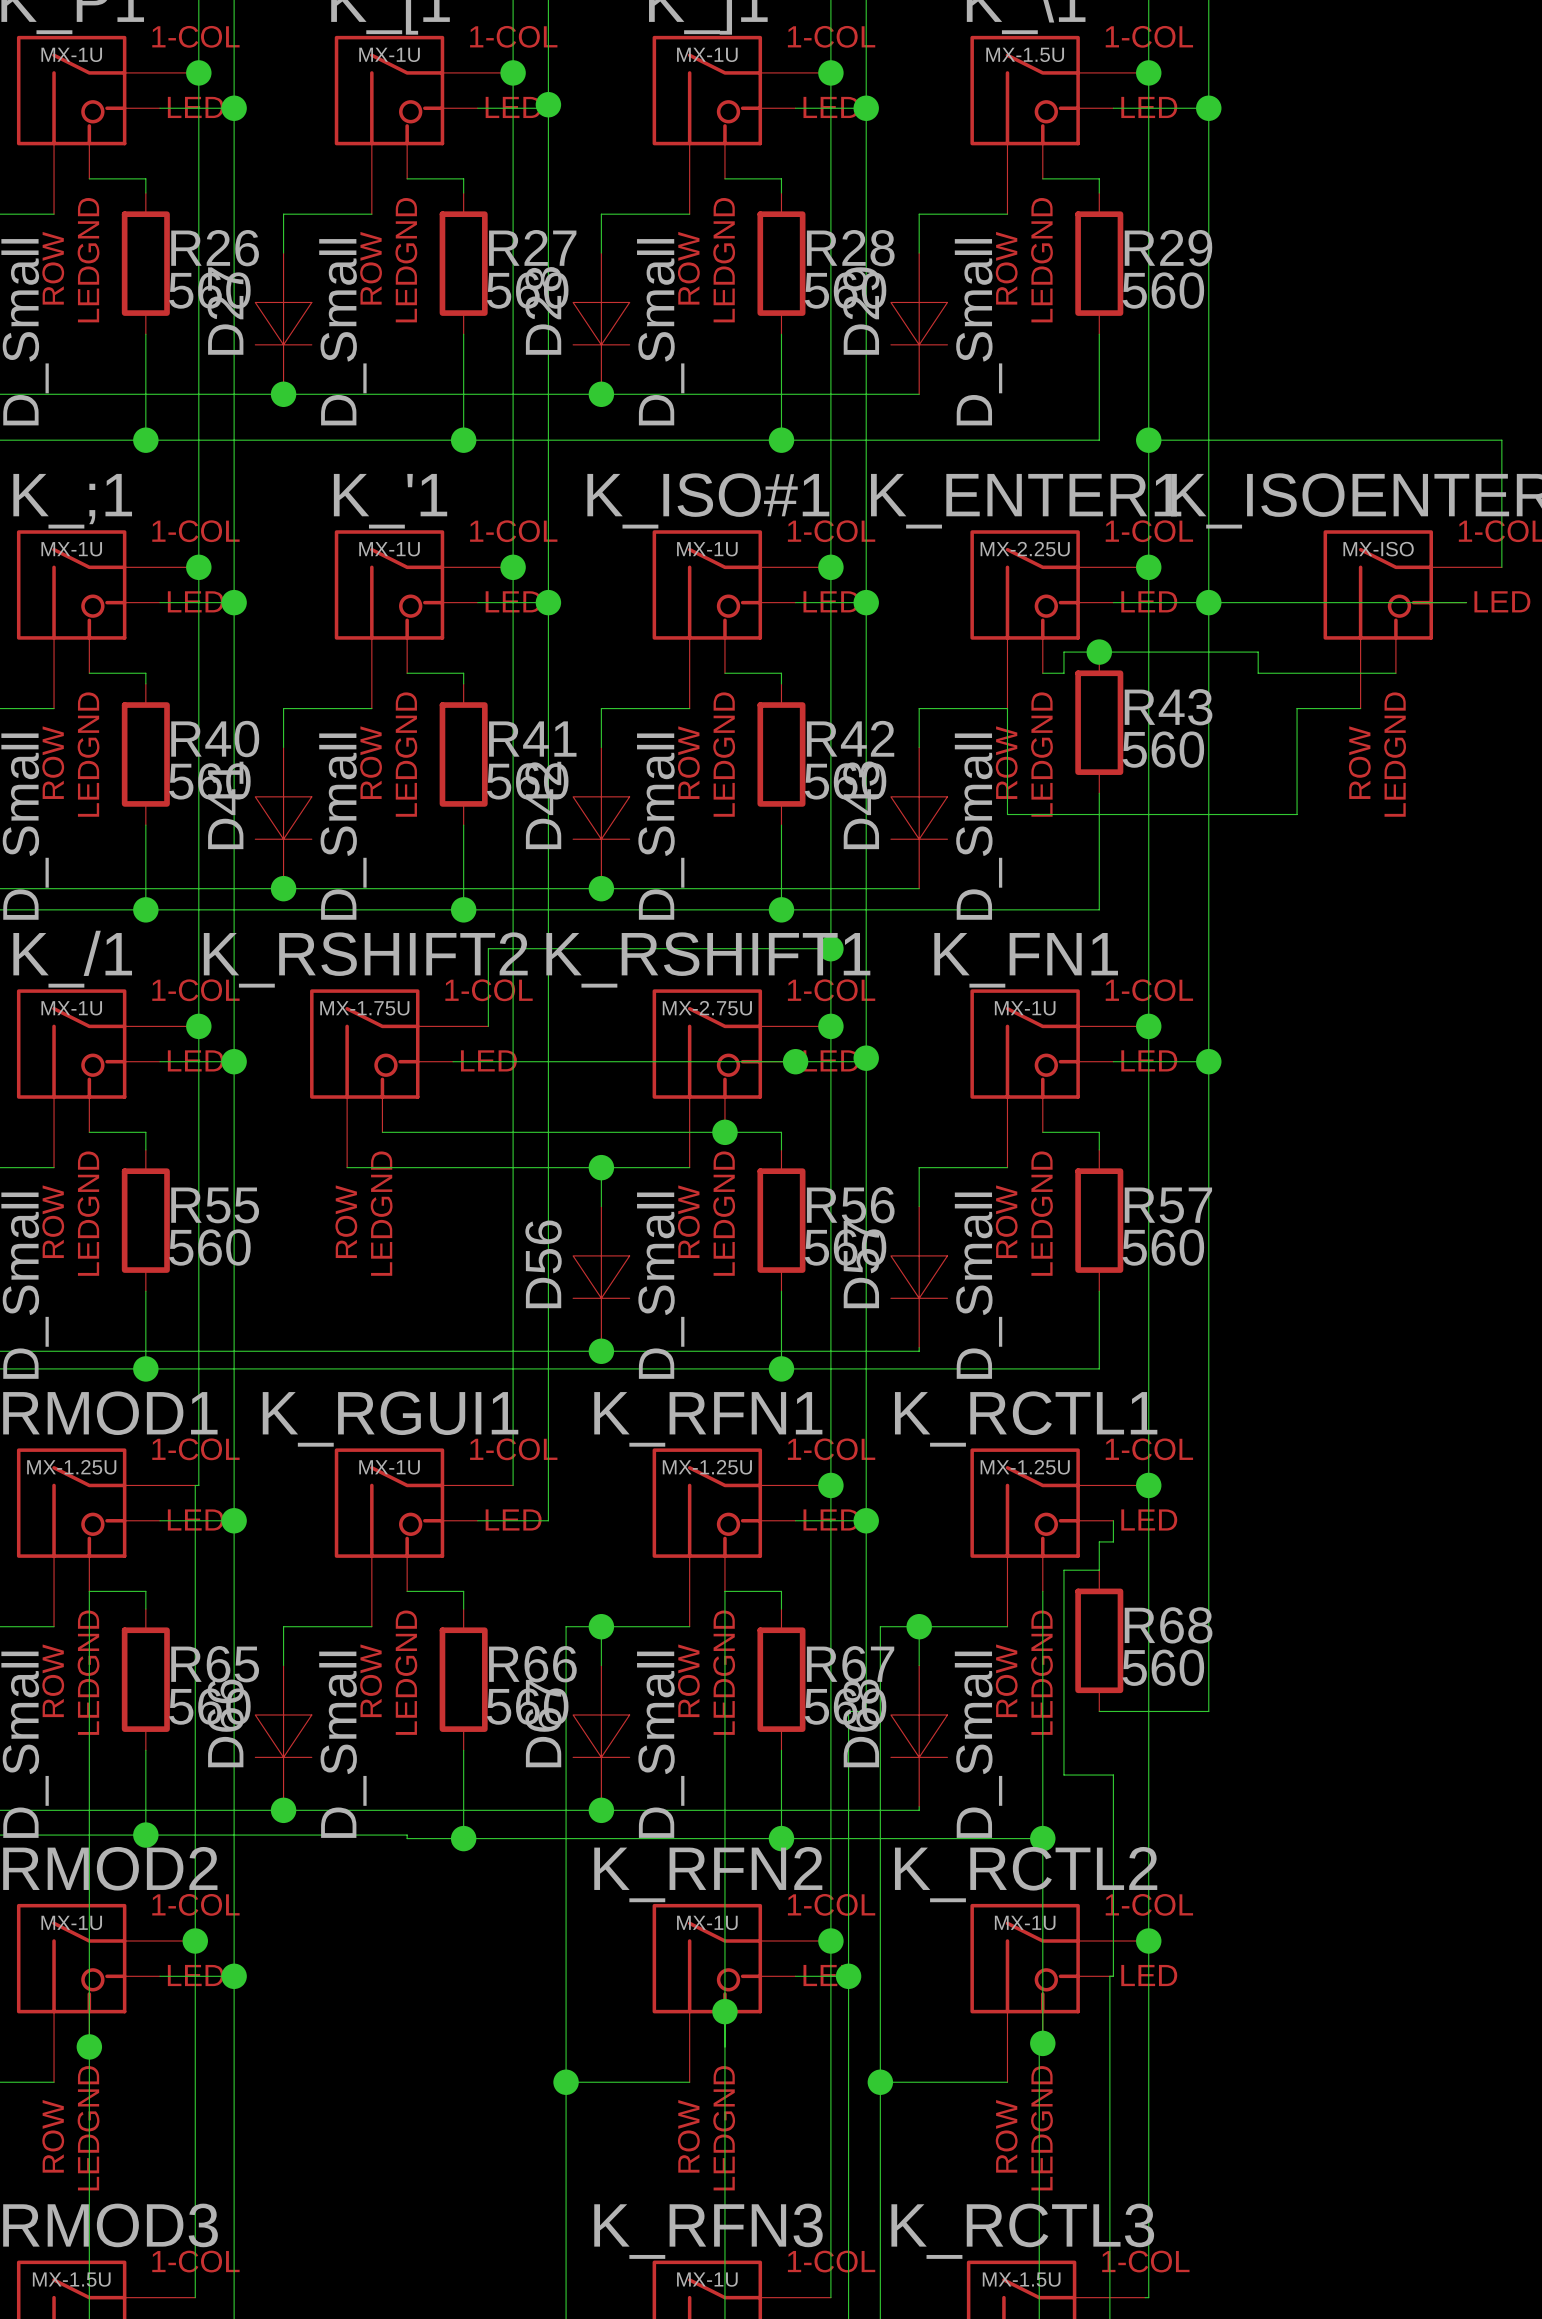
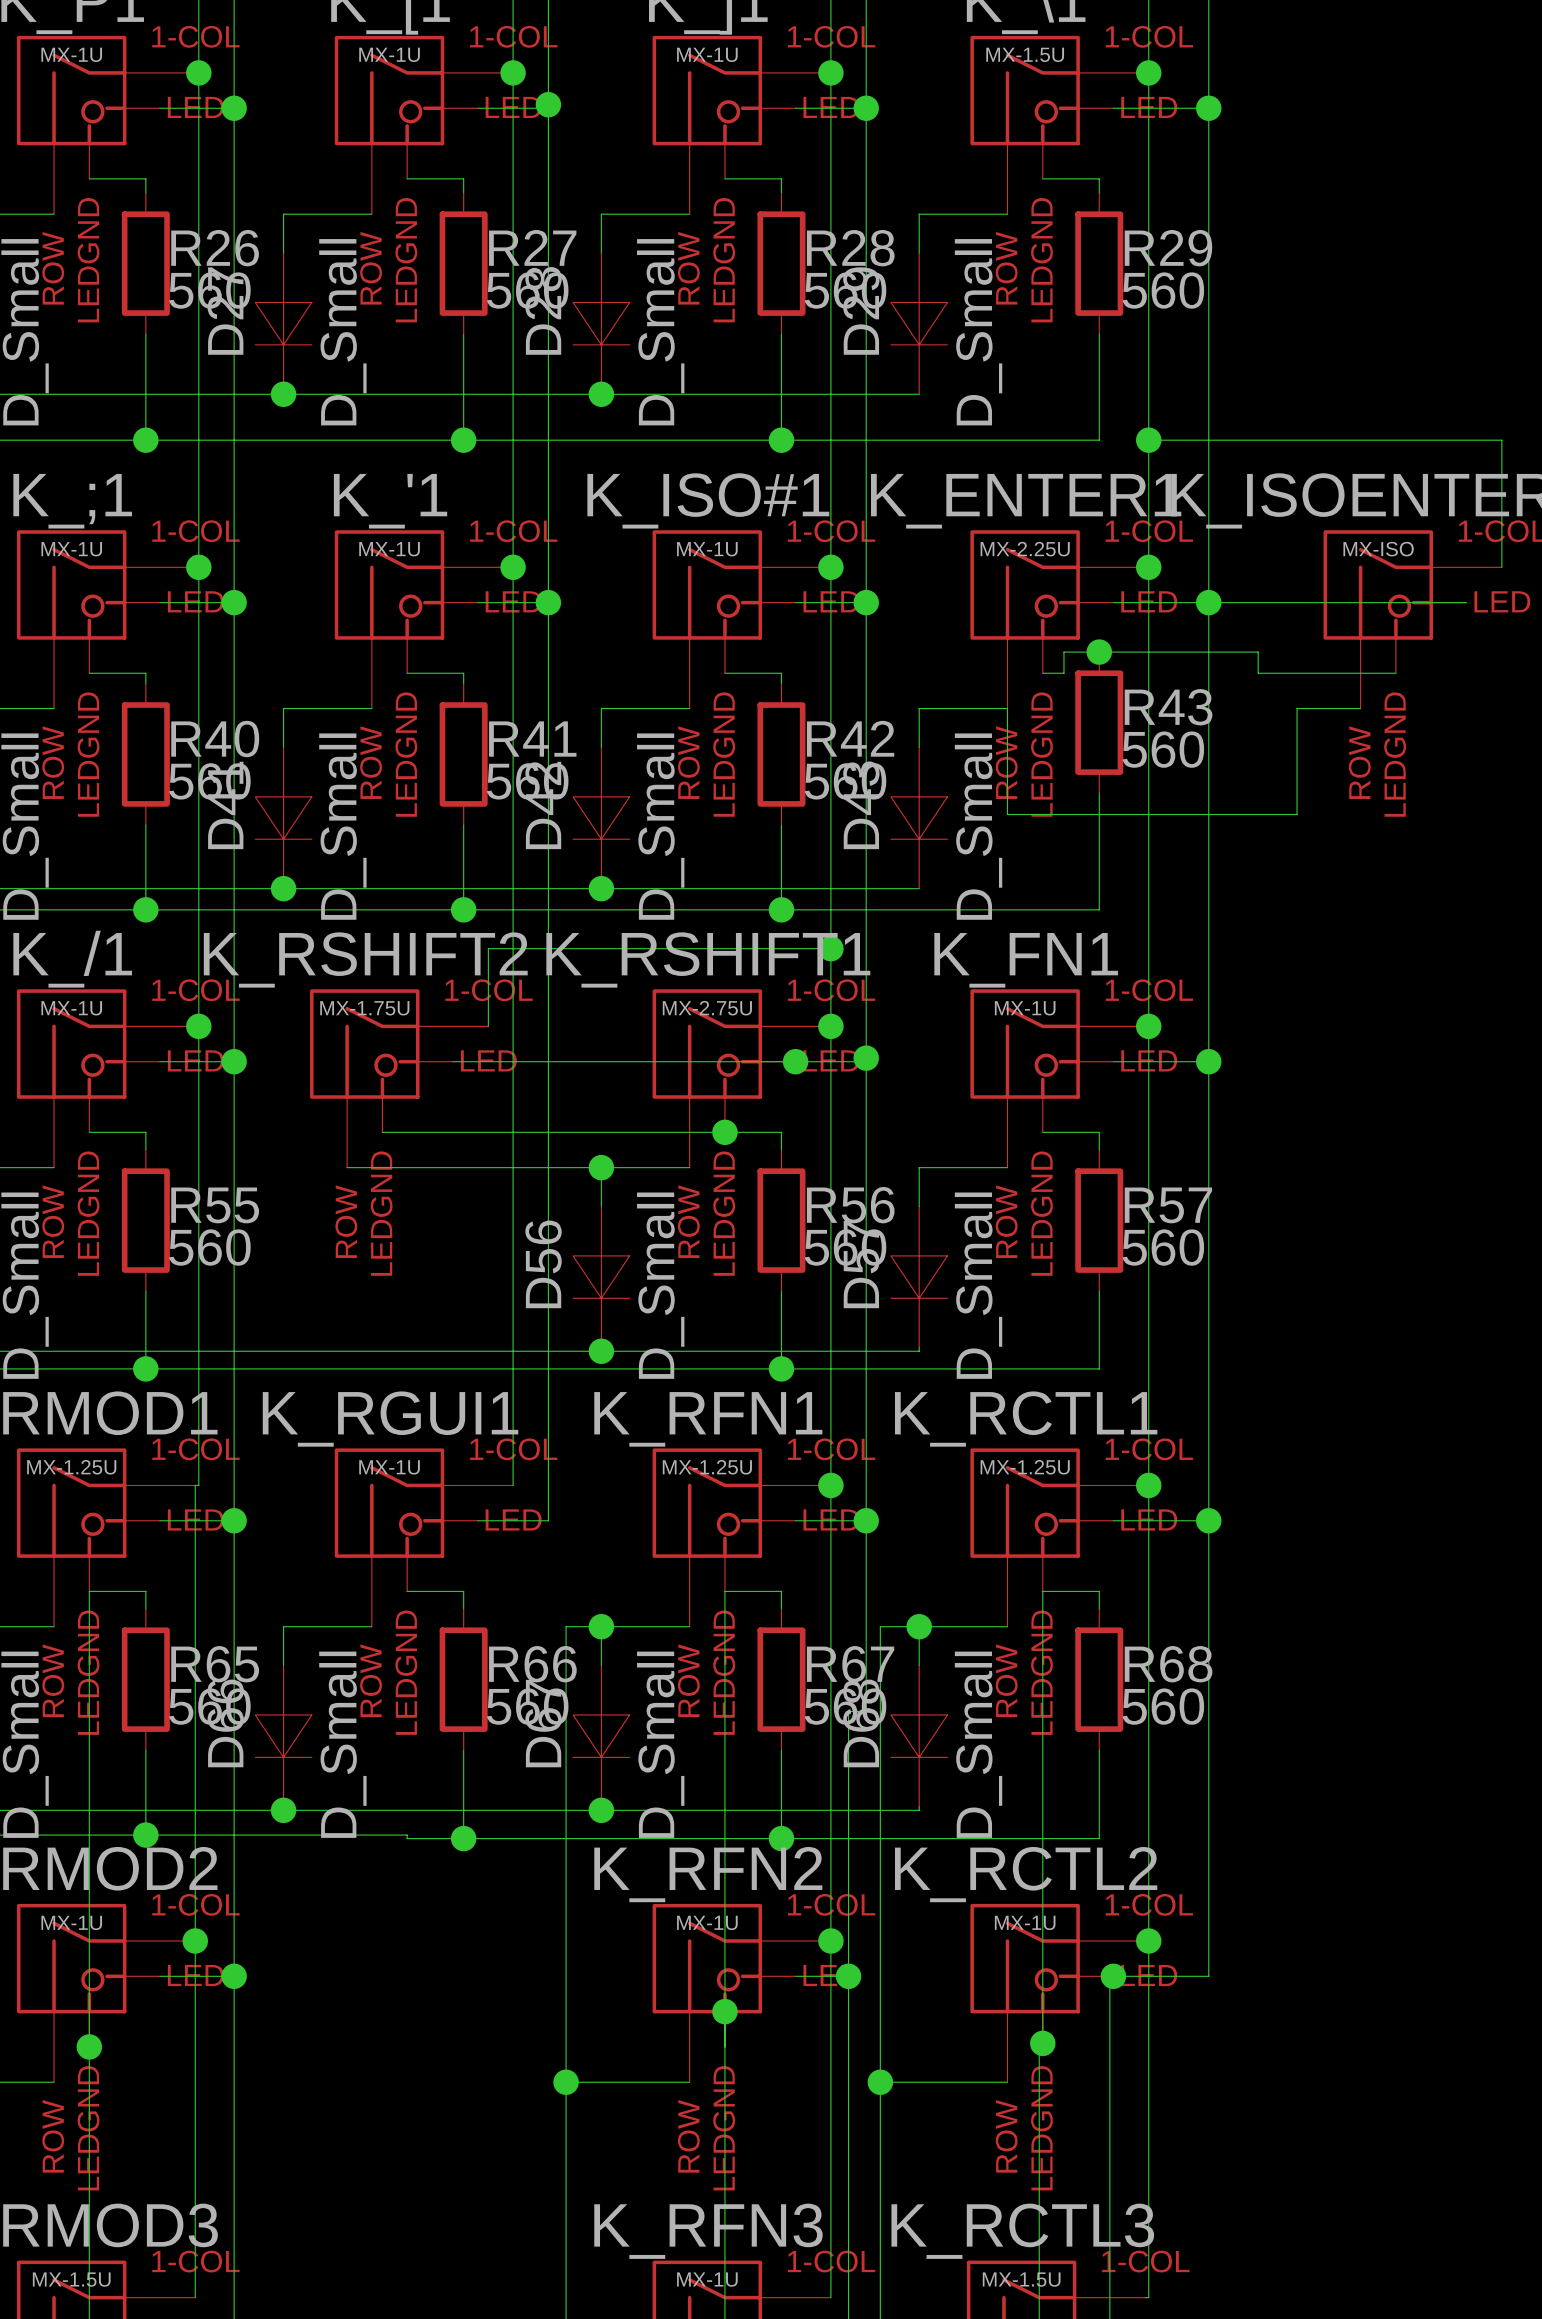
wire: (1113, 1520) (1113, 1541) (1099, 1541) (1099, 1570) (1063, 1570) (1063, 1775) (1113, 1775) (1113, 1976) -> (1208, 1711) (1208, 1976) (1113, 1976)
wire: none -> (1113, 1520) (1208, 1520)
junction: none -> (1208, 1520)
wire: none -> (1042, 1591) (1099, 1591) (1099, 1609)
R68 position: (1099, 1640) -> (1099, 1679)
wire: (1099, 1711) (1208, 1711) -> none
wire: none -> (1099, 1750) (1099, 1838) (1042, 1838)
junction position: (1042, 1838) -> (1113, 1976)

